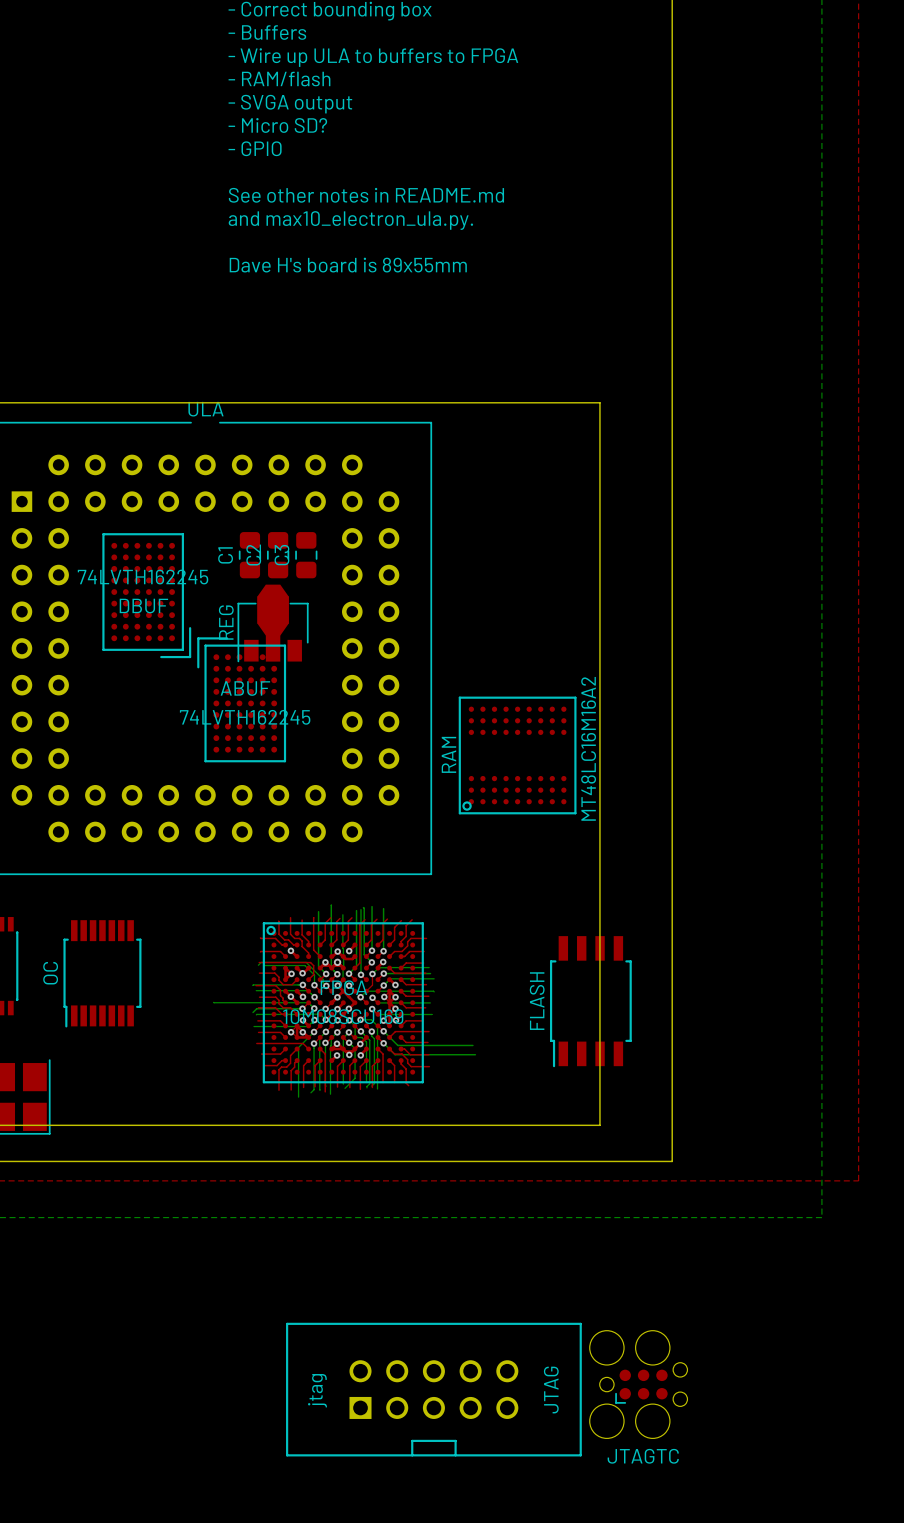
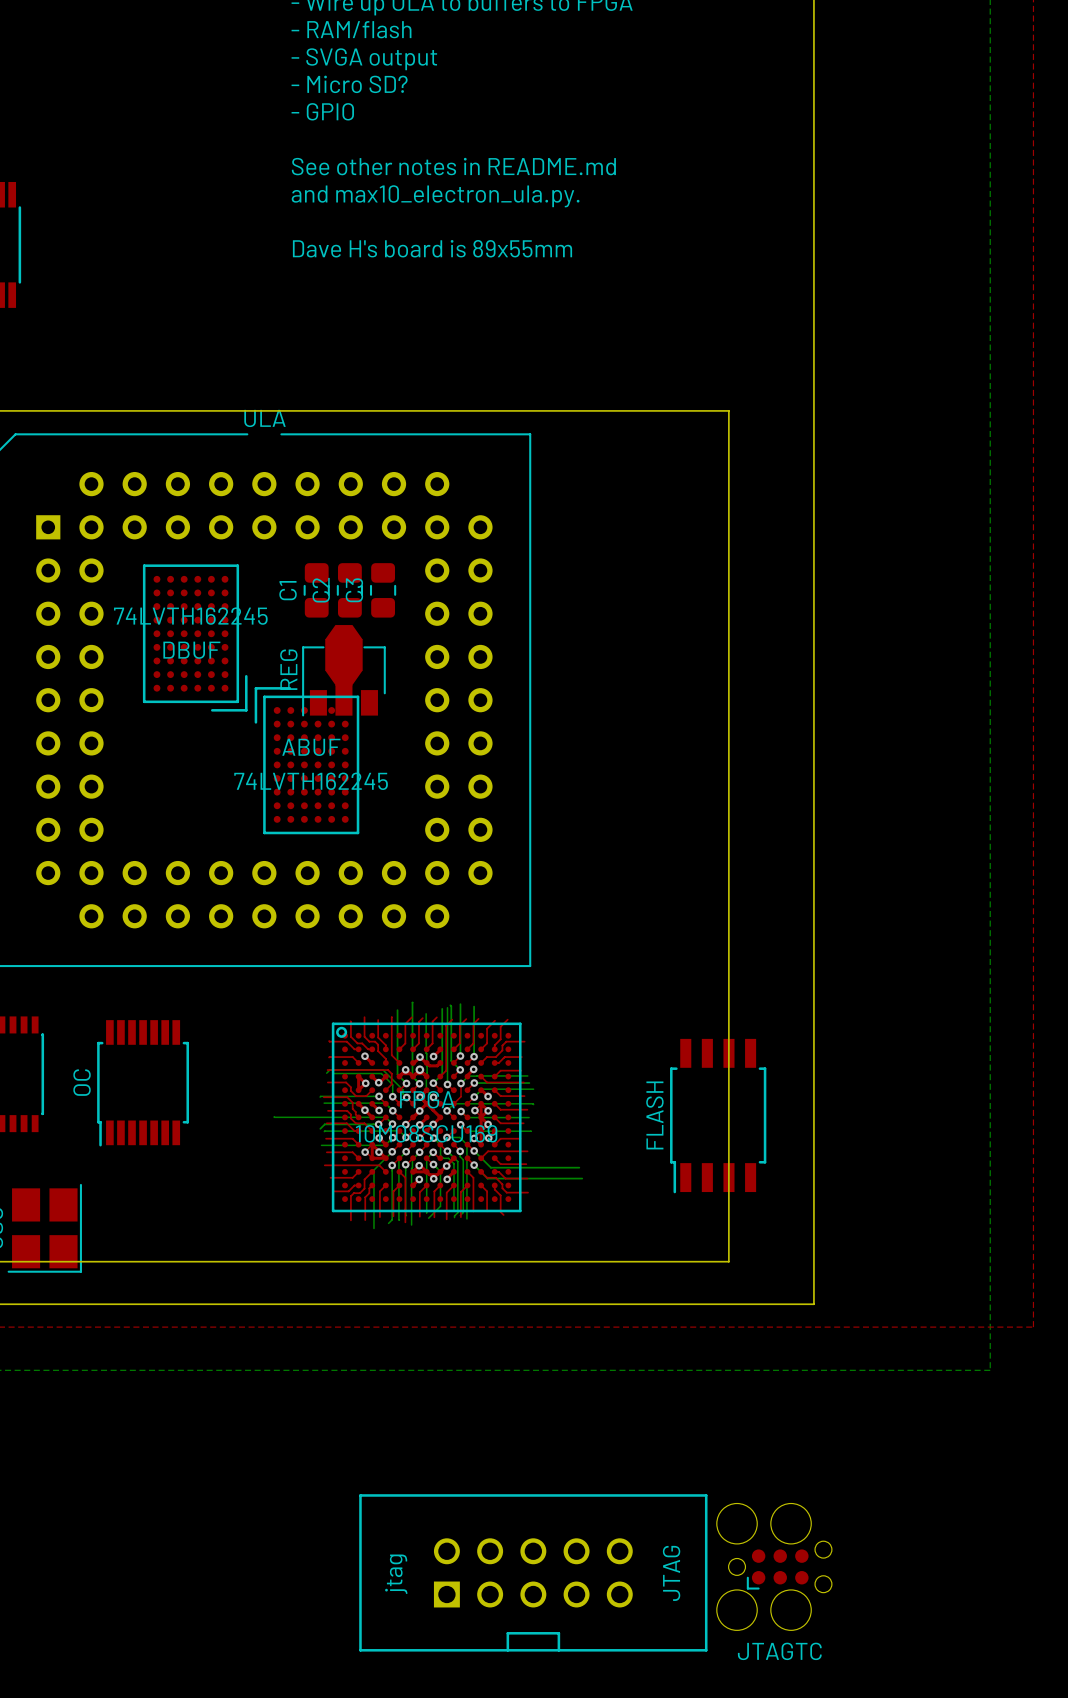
RAM: MT48LC16M16A2 (517, 755) -> none

